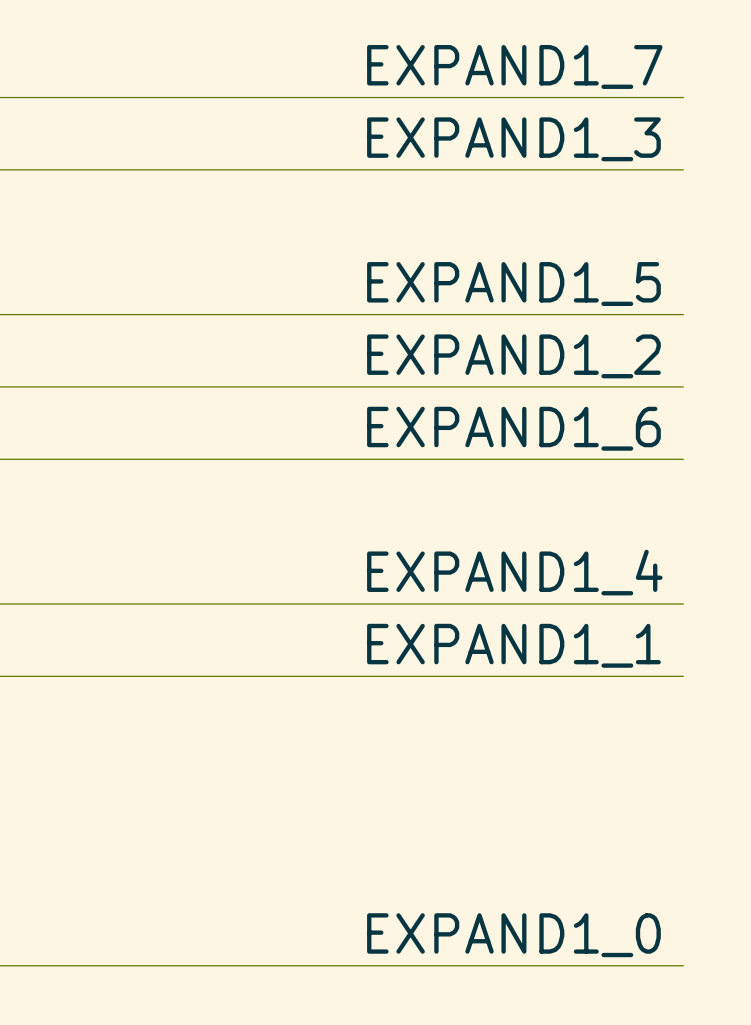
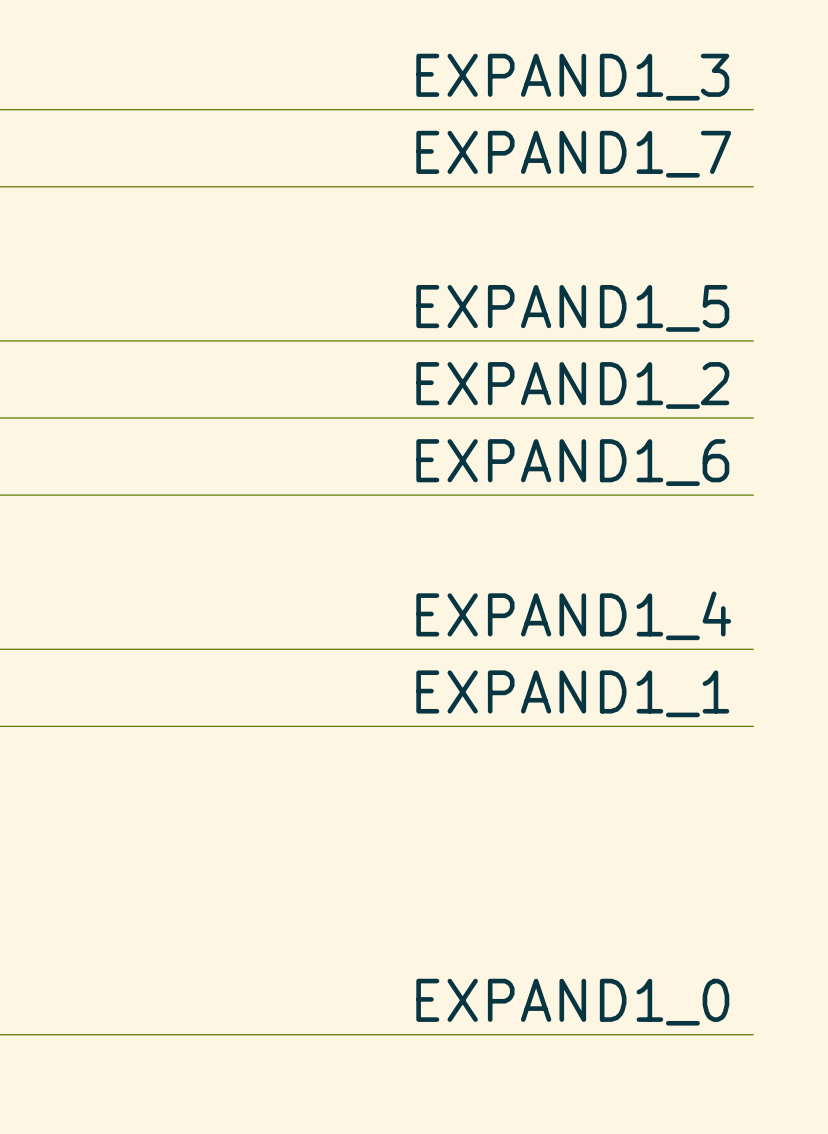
label: EXPAND1_7 (514, 66) -> EXPAND1_3 (572, 77)
label: EXPAND1_3 (513, 139) -> EXPAND1_7 (573, 154)

